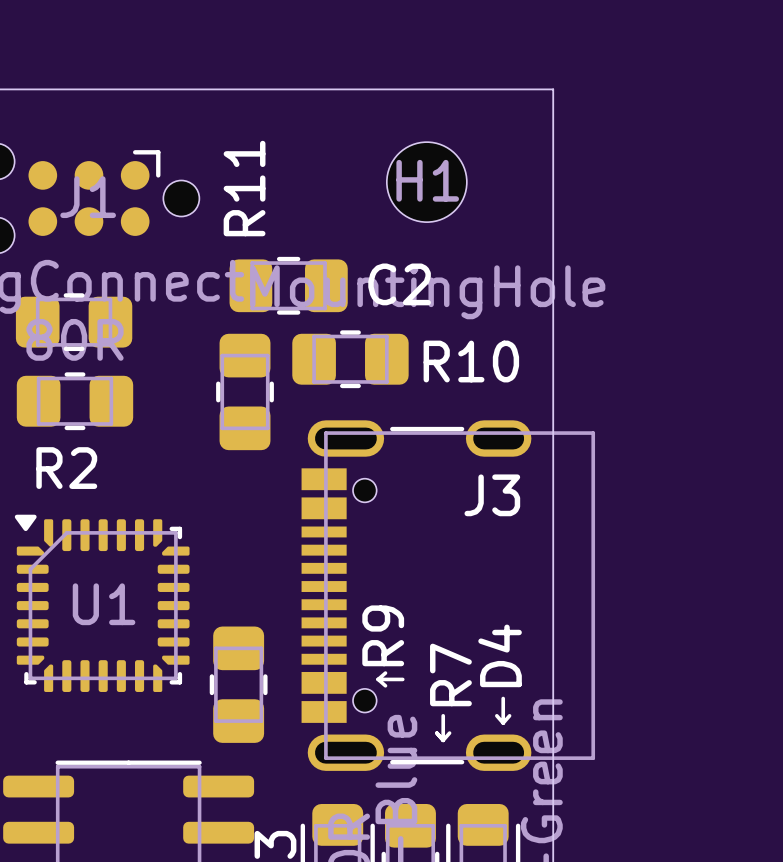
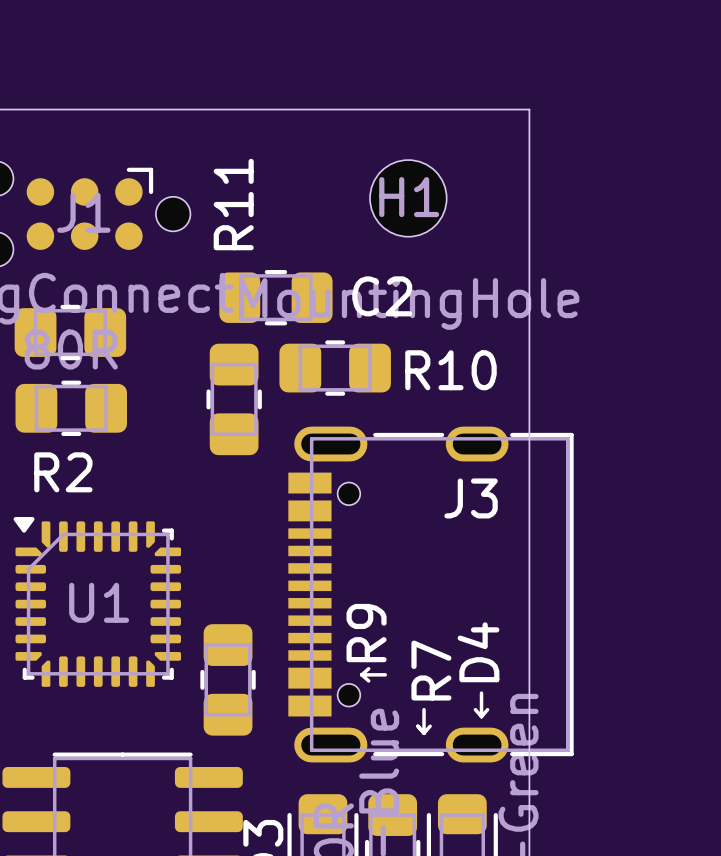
J3 footprint: [301, 420, 596, 771] -> [288, 426, 574, 763]

